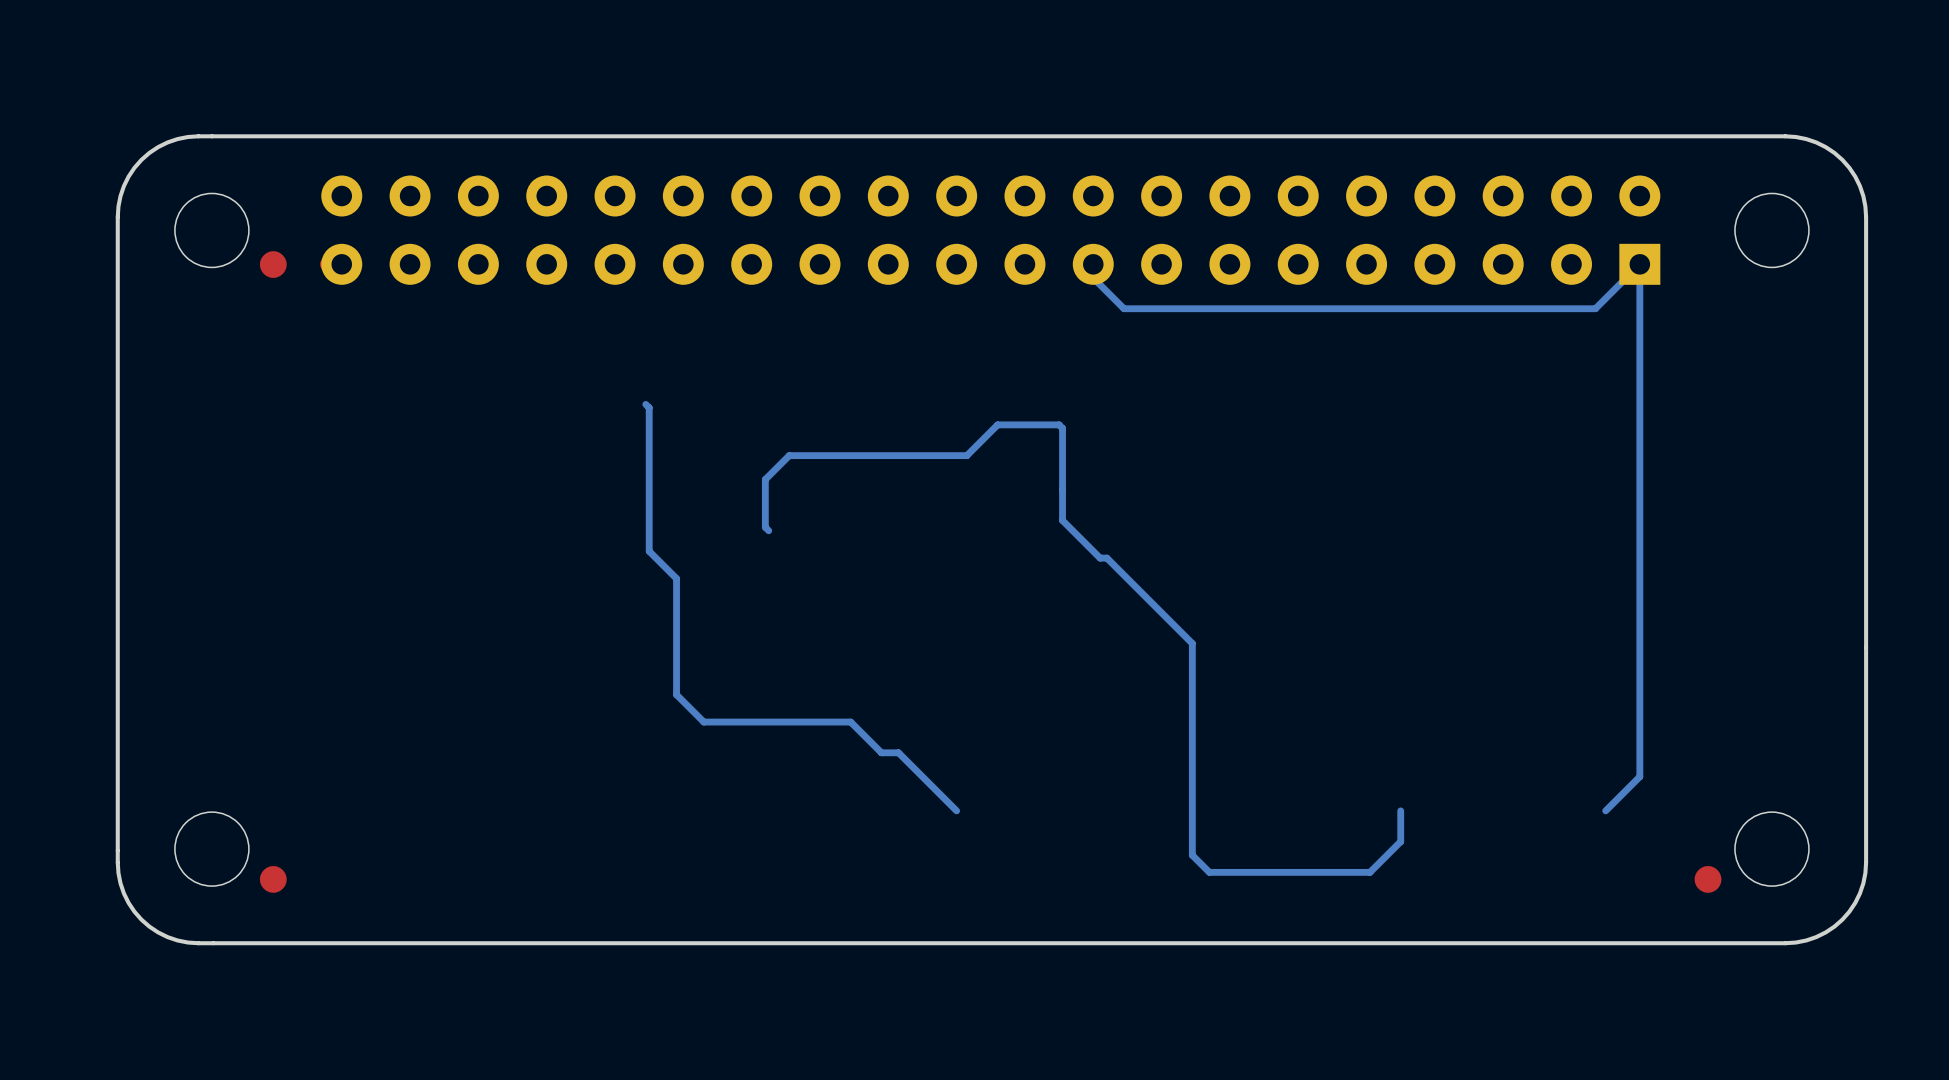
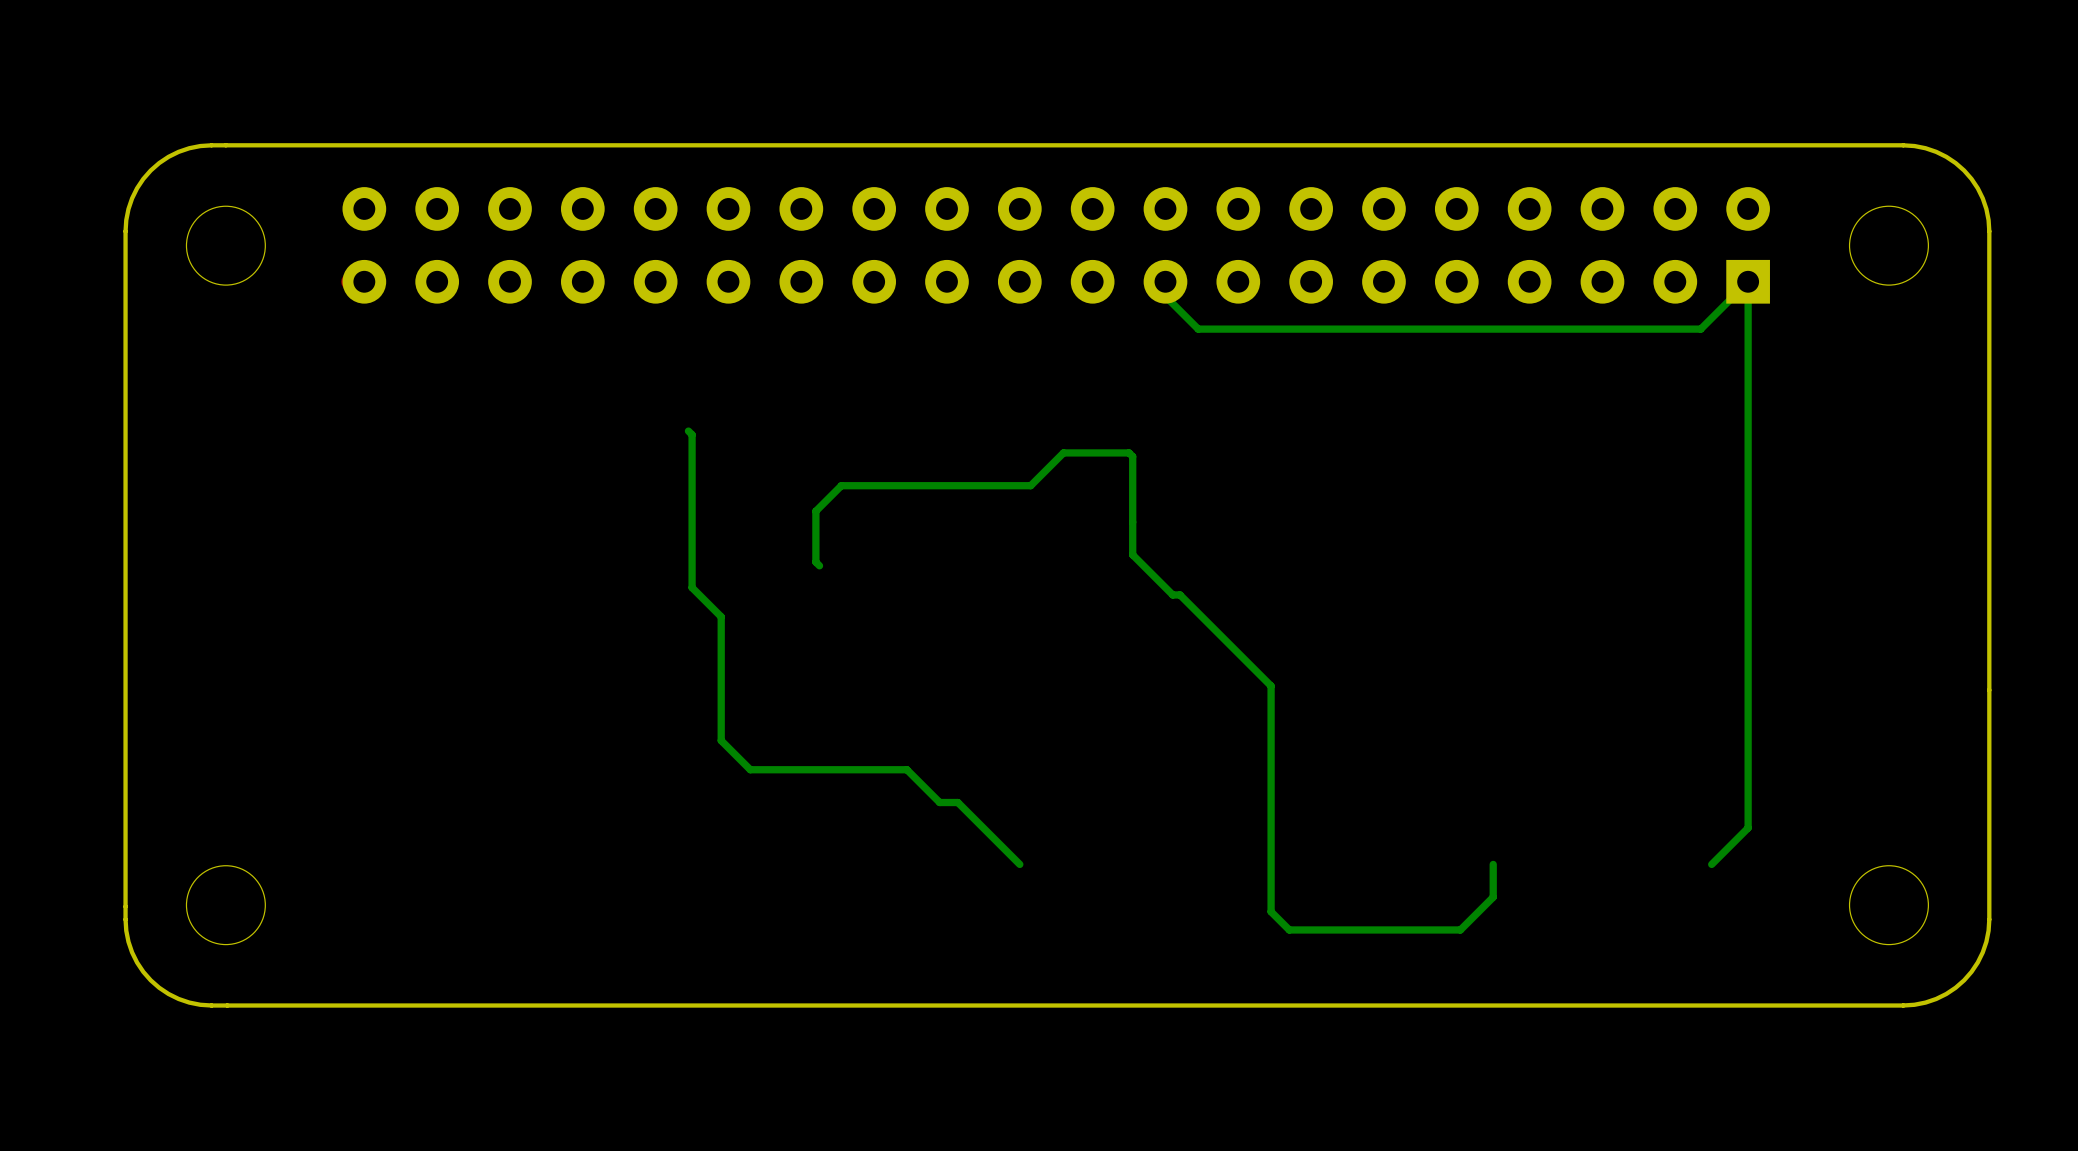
drawing: [259, 251, 287, 278] -> none
drawing: [259, 866, 287, 893] -> none
drawing: [1694, 866, 1722, 893] -> none

